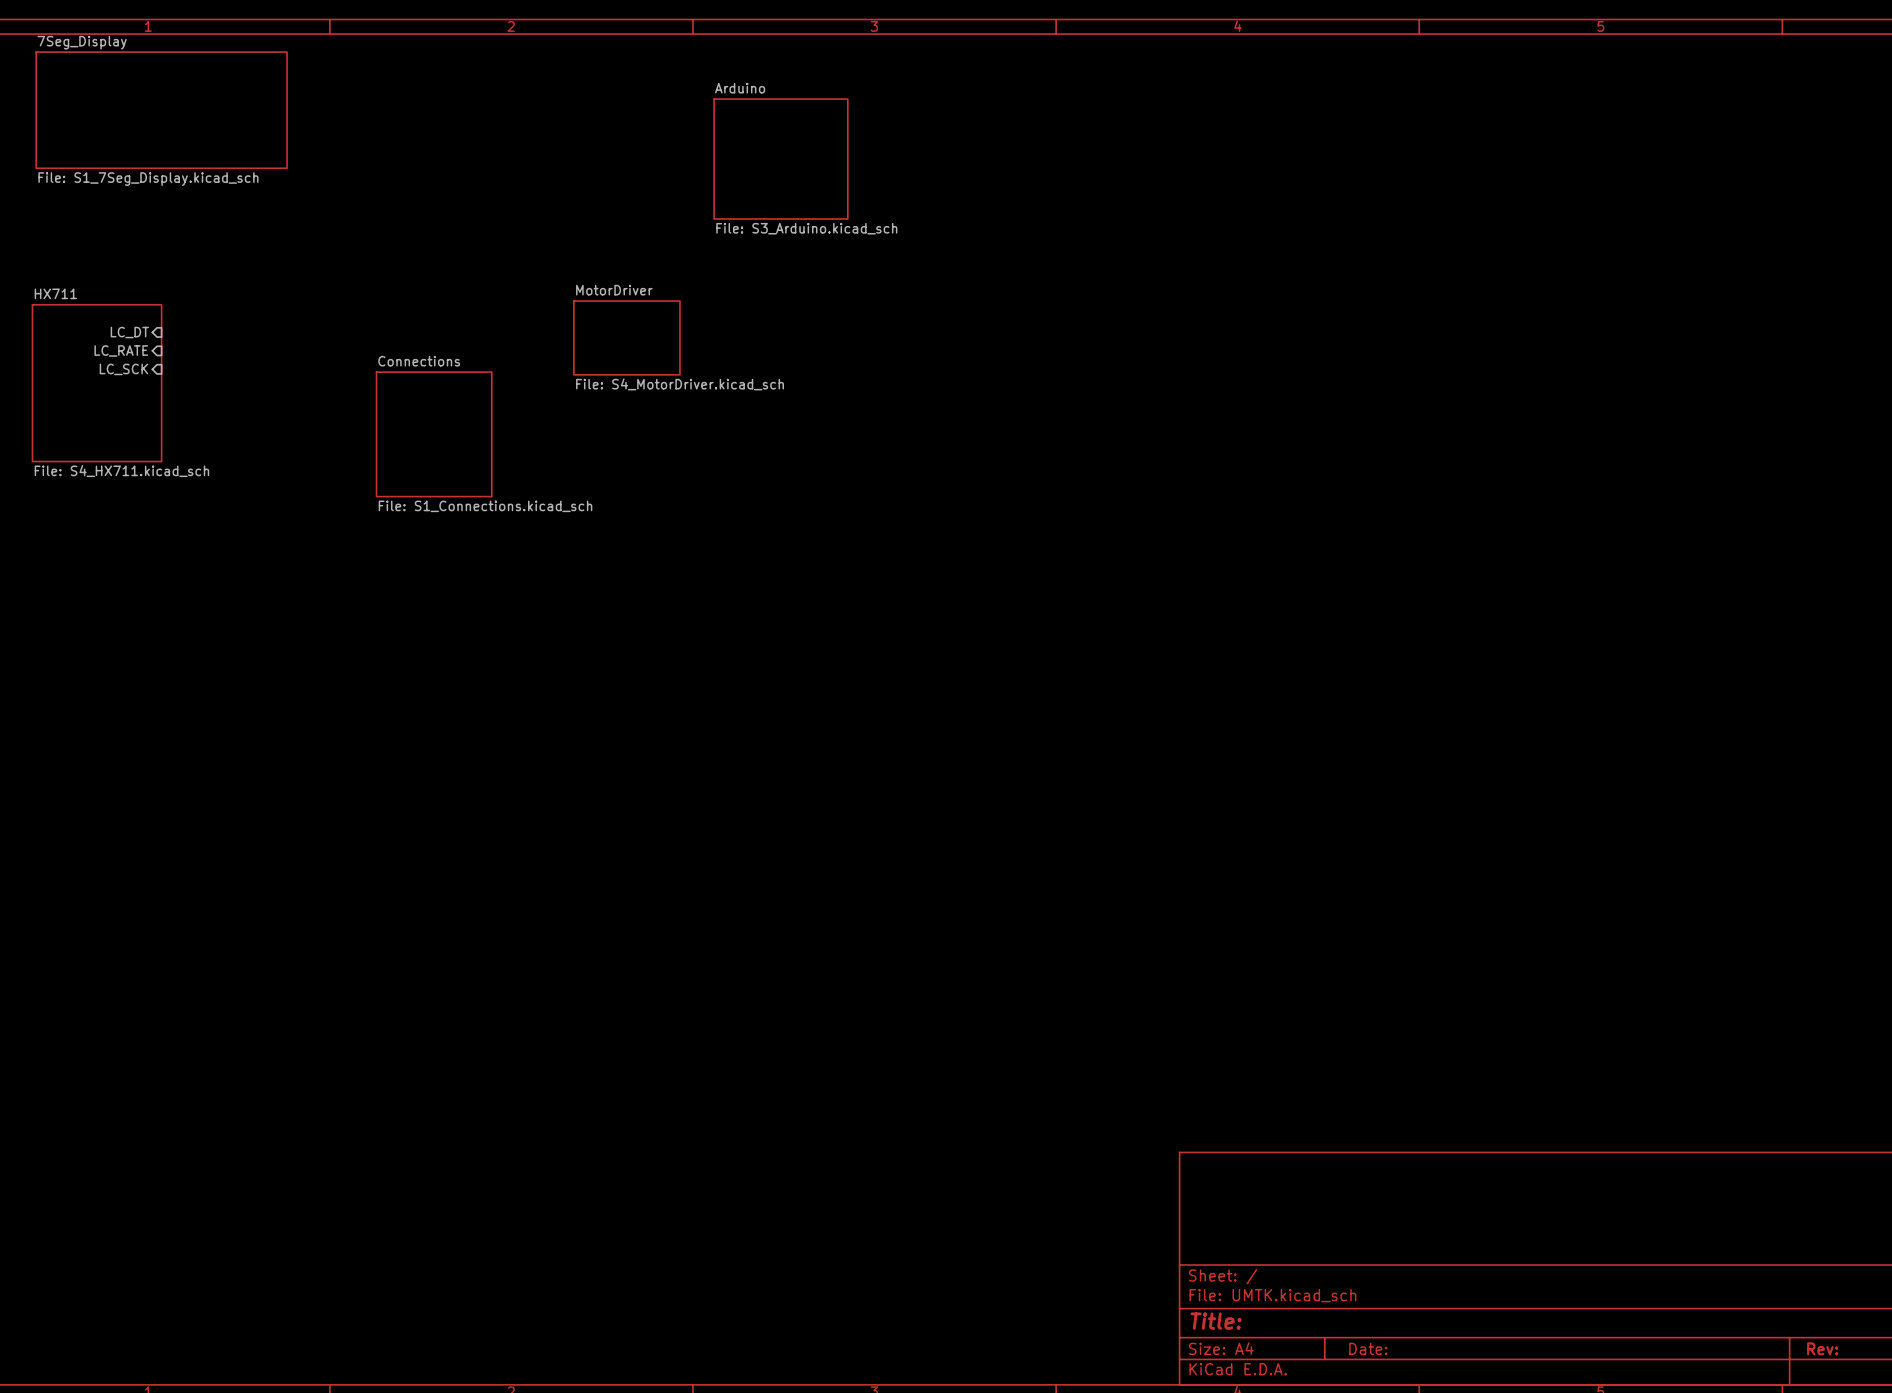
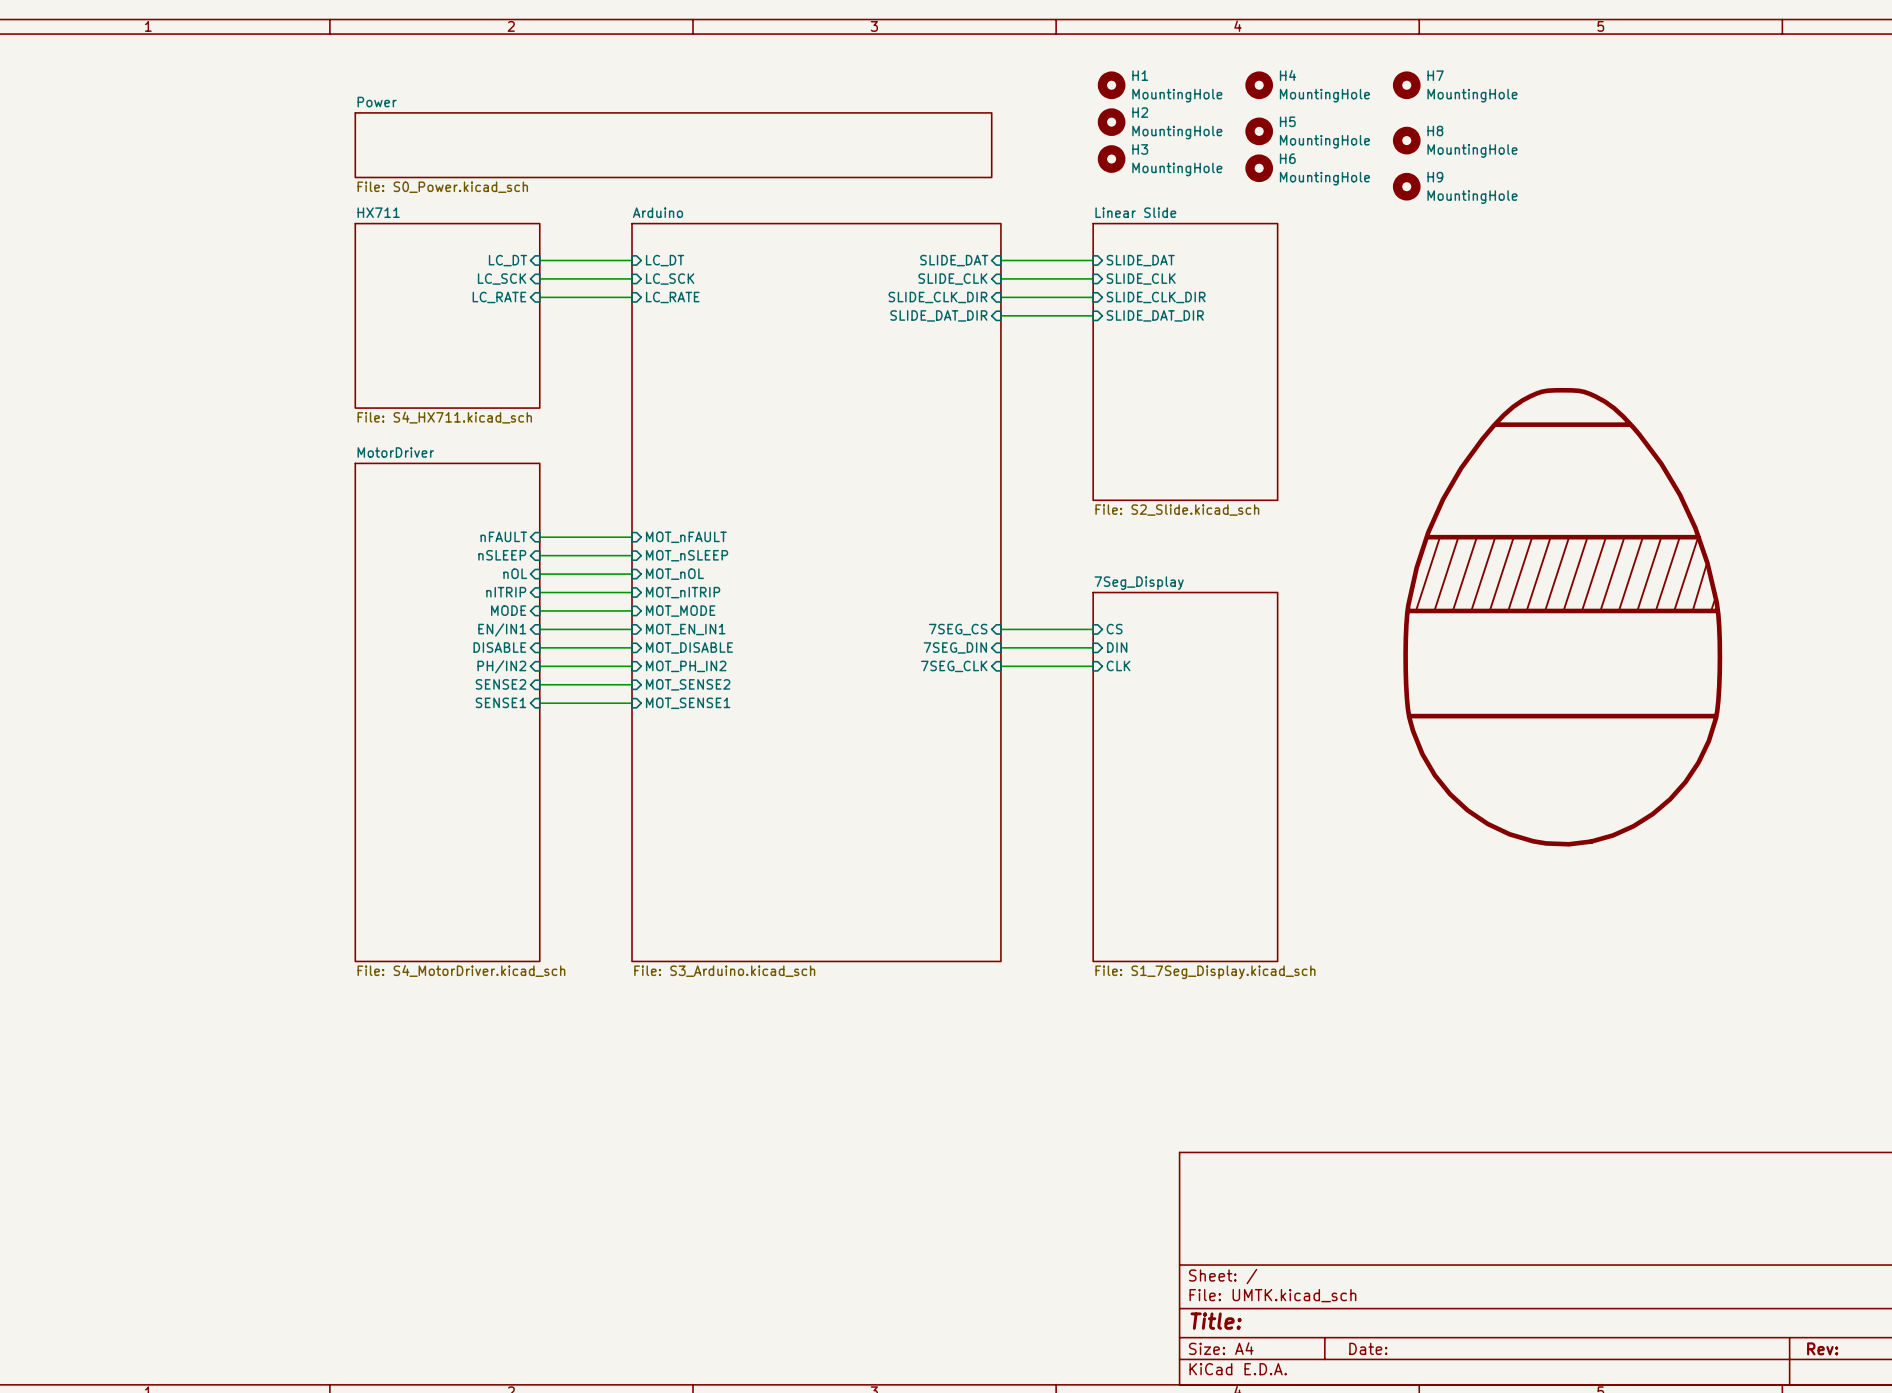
sheet 7Seg_Display name position: 7Seg_Display (82, 42) -> 7Seg_Display (1139, 583)
sheet 7Seg_Display shape: [35, 51, 288, 169] -> [1092, 591, 1279, 963]
H1: none -> MountingHole (1111, 85)
H4: none -> MountingHole (1259, 85)
H7: none -> MountingHole (1406, 85)
H2: none -> MountingHole (1111, 122)
H5: none -> MountingHole (1259, 131)
H8: none -> MountingHole (1406, 140)
sheet Power: none -> File: S0_Power.kicad_sch (673, 145)
sheet Arduino: File: S3_Arduino.kicad_sch (780, 159) -> none
H3: none -> MountingHole (1111, 159)
H6: none -> MountingHole (1259, 168)
sheet 7Seg_Display value position: File: S1_7Seg_Display.kicad_sch (148, 179) -> File: S1_7Seg_Display.kicad_sch (1205, 972)
H9: none -> MountingHole (1406, 186)
sheet pin: none -> LC_DT (508, 260)
wire: none -> (539, 260) (632, 260)
sheet pin: none -> LC_DT (665, 260)
sheet pin: none -> SLIDE_DAT (954, 260)
wire: none -> (1000, 260) (1093, 260)
sheet pin: none -> SLIDE_DAT (1140, 260)
wire: none -> (539, 278) (632, 278)
wire: none -> (1000, 278) (1093, 278)
sheet pin: none -> LC_SCK (502, 279)
sheet pin: none -> LC_SCK (670, 279)
sheet pin: none -> SLIDE_CLK (952, 279)
sheet pin: none -> SLIDE_CLK (1141, 279)
sheet HX711 name position: HX711 (55, 293) -> HX711 (378, 212)
sheet pin: none -> LC_RATE (499, 297)
wire: none -> (539, 297) (632, 297)
sheet pin: none -> LC_RATE (672, 297)
sheet pin: none -> SLIDE_CLK_DIR (937, 297)
wire: none -> (1000, 297) (1093, 297)
sheet pin: none -> SLIDE_CLK_DIR (1156, 297)
sheet HX711 shape: [31, 304, 163, 463] -> [354, 223, 541, 409]
sheet pin: none -> SLIDE_DAT_DIR (938, 315)
wire: none -> (1000, 315) (1093, 315)
sheet pin: none -> SLIDE_DAT_DIR (1155, 315)
sheet pin: LC_DT (129, 332) -> none
sheet MotorDriver: File: S4_MotorDriver.kicad_sch (626, 337) -> none
sheet pin: LC_RATE (121, 350) -> none
sheet Linear Slide: none -> File: S2_Slide.kicad_sch (1185, 361)
sheet pin: LC_SCK (123, 369) -> none
sheet Connections: File: S1_Connections.kicad_sch (434, 434) -> none
sheet HX711 value position: File: S4_HX711.kicad_sch (121, 471) -> File: S4_HX711.kicad_sch (444, 417)
sheet pin: none -> nFAULT (503, 536)
wire: none -> (539, 537) (632, 537)
sheet pin: none -> MOT_nFAULT (686, 537)
sheet pin: none -> nSLEEP (502, 555)
wire: none -> (539, 555) (632, 555)
sheet pin: none -> MOT_nSLEEP (687, 555)
sheet pin: none -> nOL (515, 573)
wire: none -> (539, 574) (632, 574)
sheet pin: none -> MOT_nOL (674, 574)
sheet pin: none -> nITRIP (506, 592)
wire: none -> (539, 592) (632, 592)
sheet pin: none -> MOT_nITRIP (683, 592)
sheet Arduino: none -> File: S3_Arduino.kicad_sch (816, 592)
sheet pin: none -> MODE (508, 610)
wire: none -> (539, 610) (632, 610)
sheet pin: none -> MOT_MODE (680, 611)
part: none -> (1562, 617)
sheet pin: none -> EN/IN1 (502, 629)
wire: none -> (539, 629) (632, 629)
sheet pin: none -> MOT_EN_IN1 (685, 629)
sheet pin: none -> 7SEG_CS (958, 629)
wire: none -> (1000, 629) (1093, 629)
sheet pin: none -> CS (1114, 629)
sheet pin: none -> DISABLE (499, 647)
wire: none -> (539, 647) (632, 647)
sheet pin: none -> MOT_DISABLE (689, 647)
sheet pin: none -> 7SEG_DIN (955, 647)
wire: none -> (1000, 647) (1093, 647)
sheet pin: none -> DIN (1117, 647)
sheet pin: none -> CLK (1118, 665)
sheet pin: none -> PH/IN2 (501, 666)
wire: none -> (539, 666) (632, 666)
sheet pin: none -> MOT_PH_IN2 (686, 666)
sheet pin: none -> 7SEG_CLK (954, 666)
wire: none -> (1000, 666) (1093, 666)
sheet pin: none -> SENSE2 (500, 684)
wire: none -> (539, 684) (632, 684)
sheet pin: none -> MOT_SENSE2 (688, 684)
sheet pin: none -> SENSE1 (500, 702)
wire: none -> (539, 703) (632, 703)
sheet pin: none -> MOT_SENSE1 (688, 703)
sheet MotorDriver: none -> File: S4_MotorDriver.kicad_sch (447, 712)

